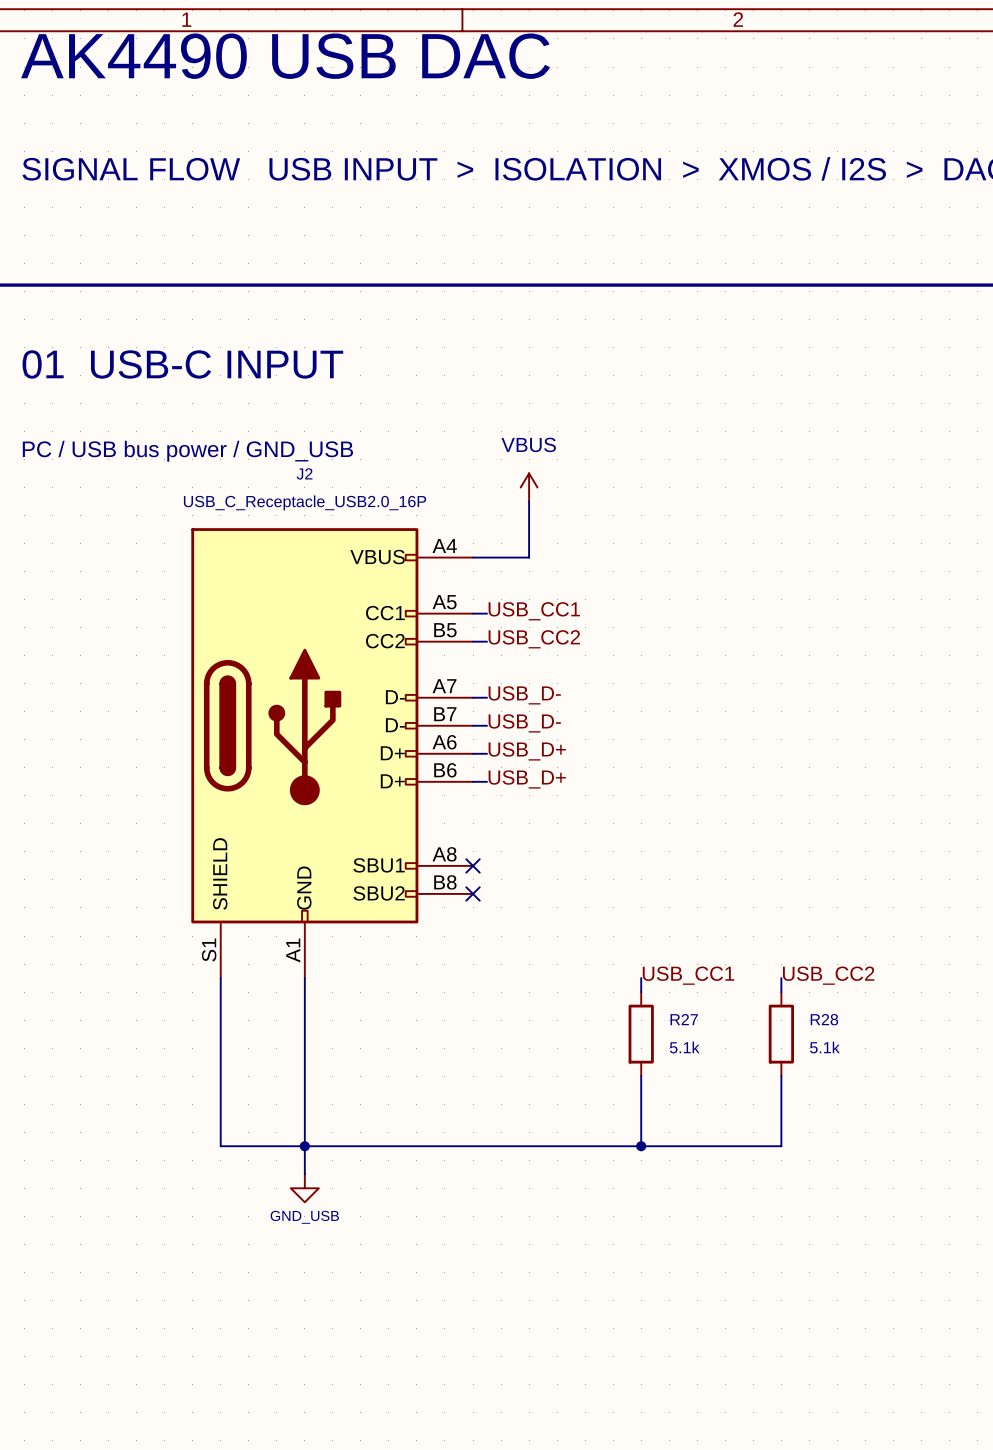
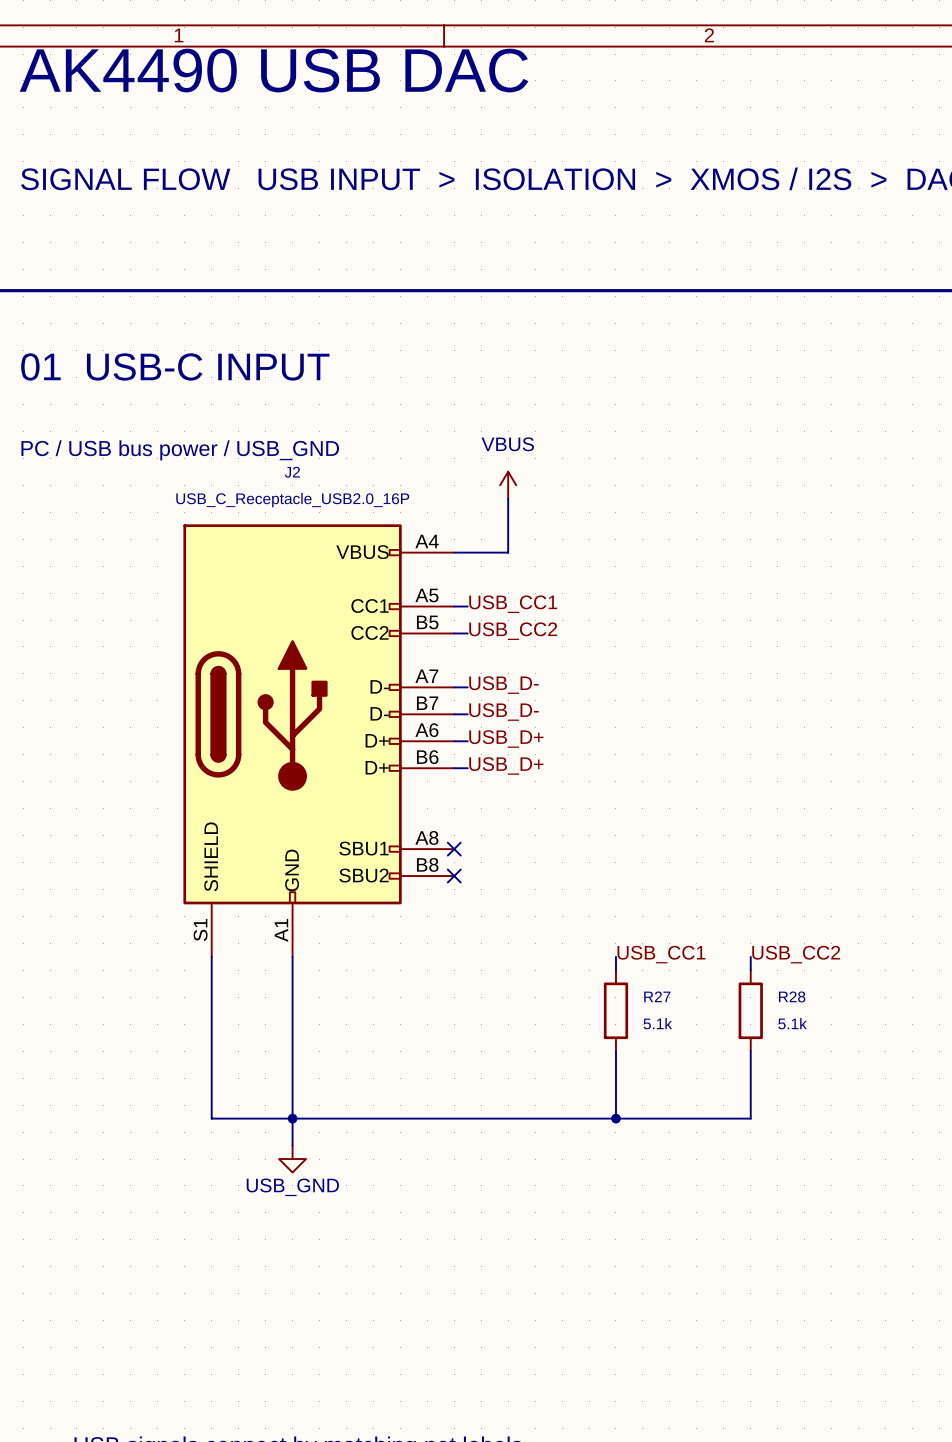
text: PC / USB bus power / GND_USB (187, 451) -> PC / USB bus power / USB_GND (180, 450)
power symbol: GND_USB (304, 1188) -> USB_GND (292, 1159)

